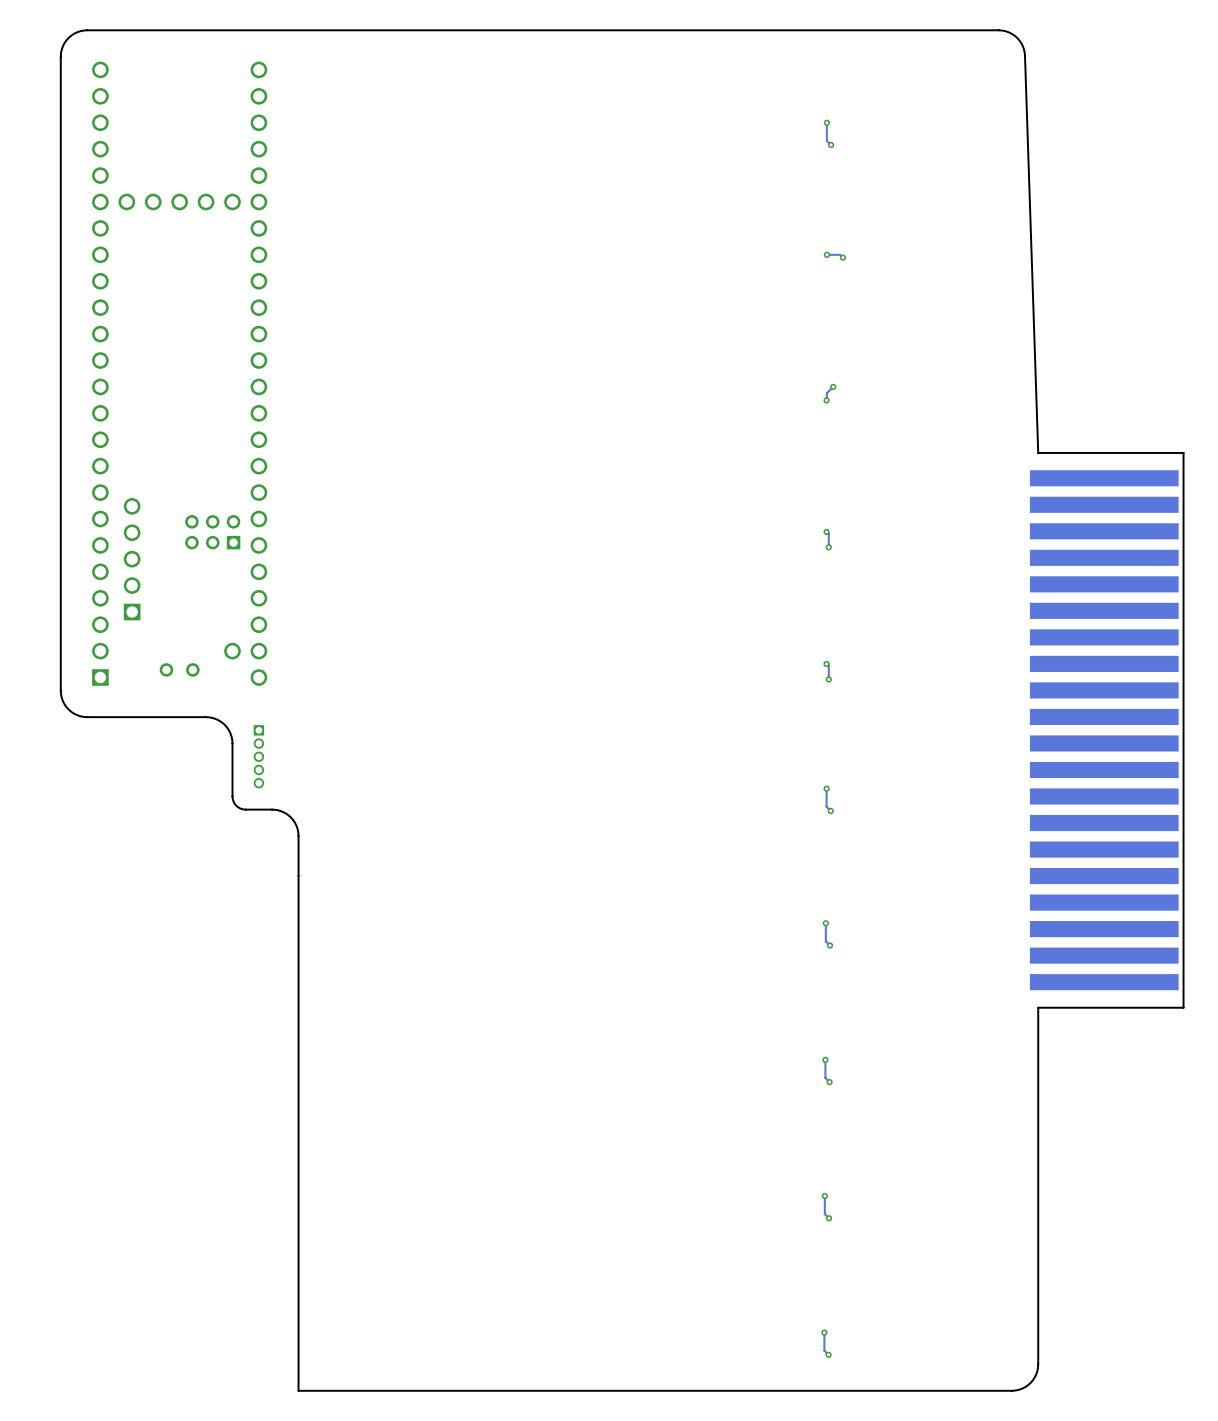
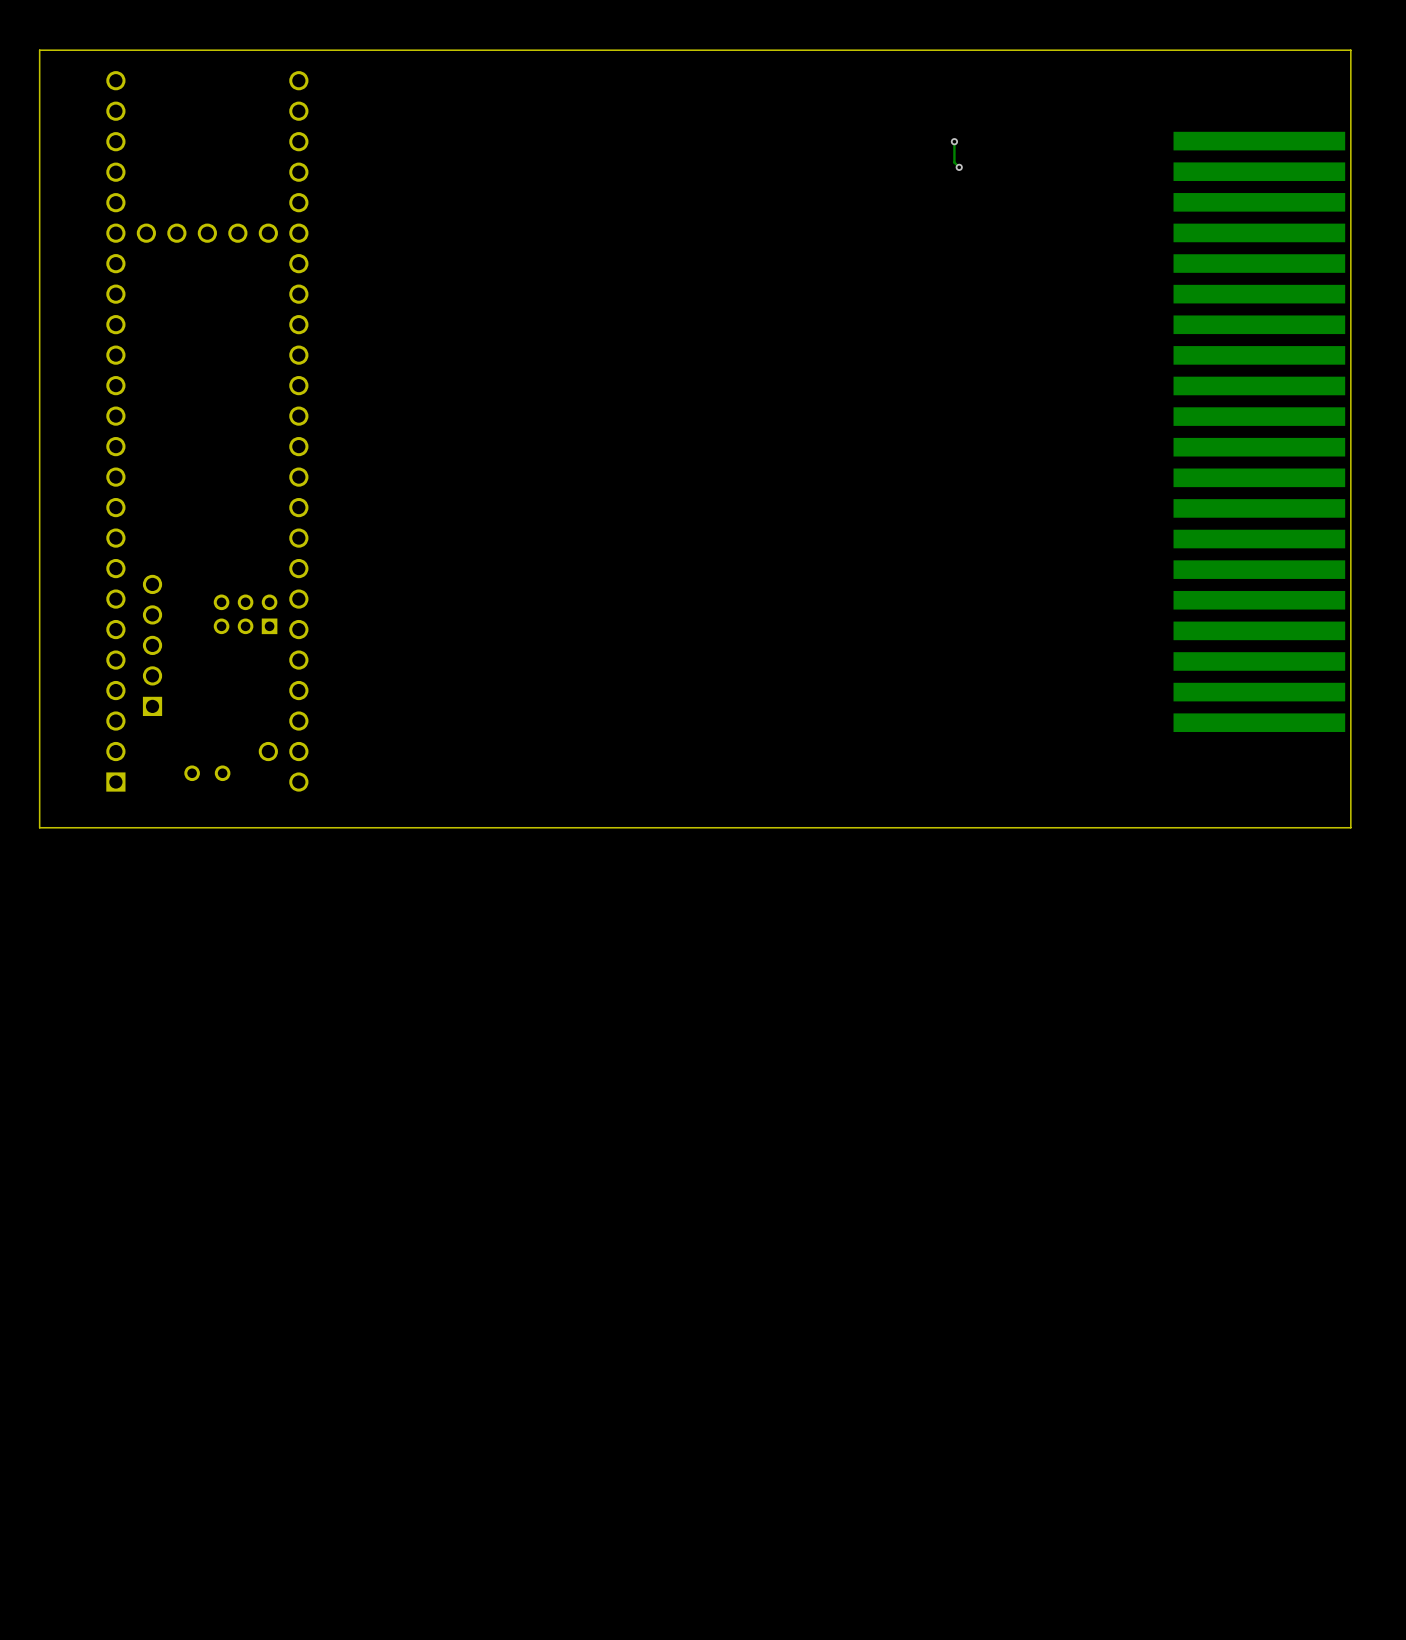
track: (826, 254) (840, 254) (842, 257) -> none
via: (826, 254) -> none
via: (842, 257) -> none
part: none -> (1259, 431)
track: (833, 386) (826, 393) (826, 400) -> none
via: (833, 386) -> none
via: (826, 400) -> none
track: (826, 531) (828, 534) (828, 547) -> none
via: (826, 531) -> none
via: (828, 547) -> none
track: (826, 663) (828, 666) (828, 679) -> none
via: (826, 663) -> none
via: (828, 679) -> none
board edge: (206, 717) (222, 722) (231, 736) (232, 796) (235, 804) (244, 809) (282, 811) (293, 819) (298, 832) (298, 1390) (1011, 1390) (1021, 1388) (1032, 1380) (1038, 1364) (1038, 1007) (1183, 1007) (1183, 452) (1038, 452) (1025, 56) (1021, 43) (1014, 35) (998, 30) (87, 30) (71, 35) (64, 43) (60, 56) (60, 690) (62, 700) (68, 709) (77, 715) (87, 717) -> (237, 827) (1350, 827) (1350, 50) (39, 50) (39, 827) (100, 827)
part: (1104, 730) -> none
part: (258, 756) -> none
track: (826, 788) (826, 806) (830, 810) -> none
via: (826, 788) -> none
via: (830, 810) -> none
track: (825, 923) (825, 941) (830, 945) -> none
via: (825, 923) -> none
via: (830, 945) -> none
track: (825, 1059) (825, 1077) (829, 1082) -> none
via: (825, 1059) -> none
via: (829, 1082) -> none
track: (824, 1196) (824, 1214) (829, 1218) -> none
via: (824, 1196) -> none
via: (829, 1218) -> none
track: (824, 1332) (824, 1350) (828, 1354) -> none
via: (824, 1332) -> none
via: (828, 1354) -> none

